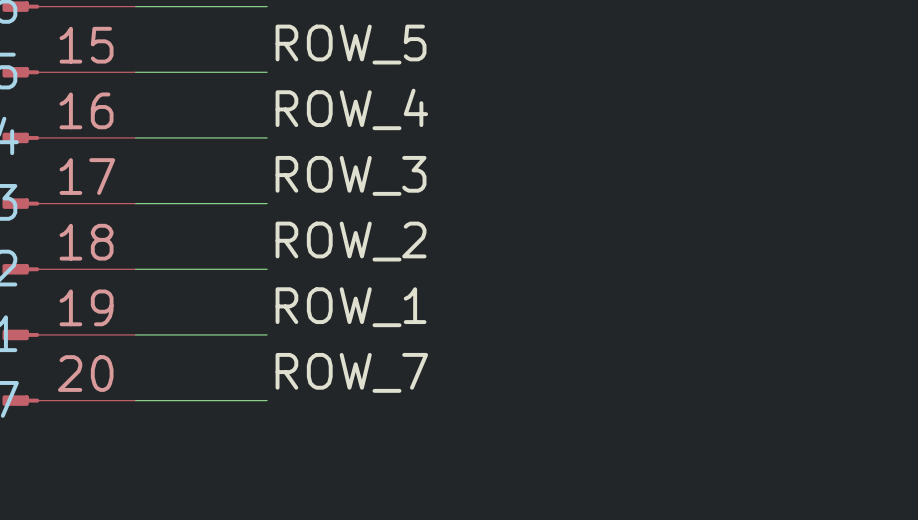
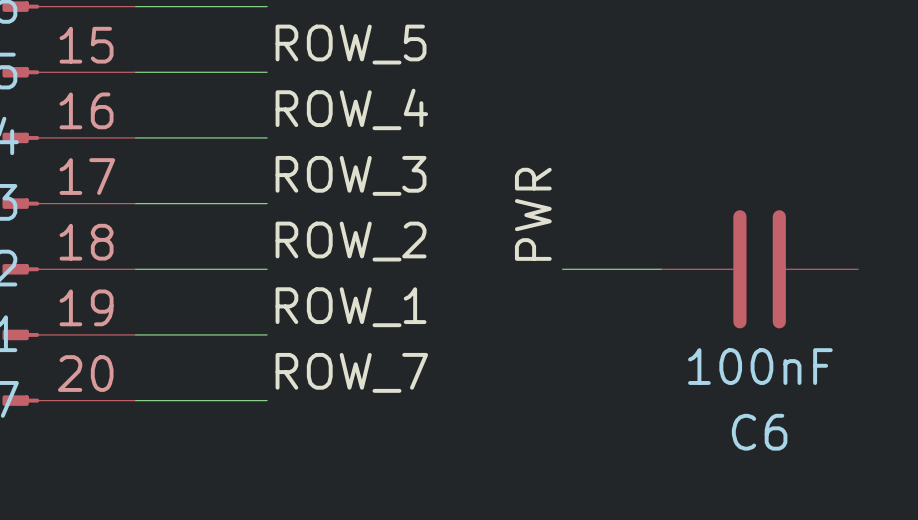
label: none -> PWR (533, 214)
wire: none -> (562, 269) (661, 269)
C6: none -> 100nF (759, 269)

